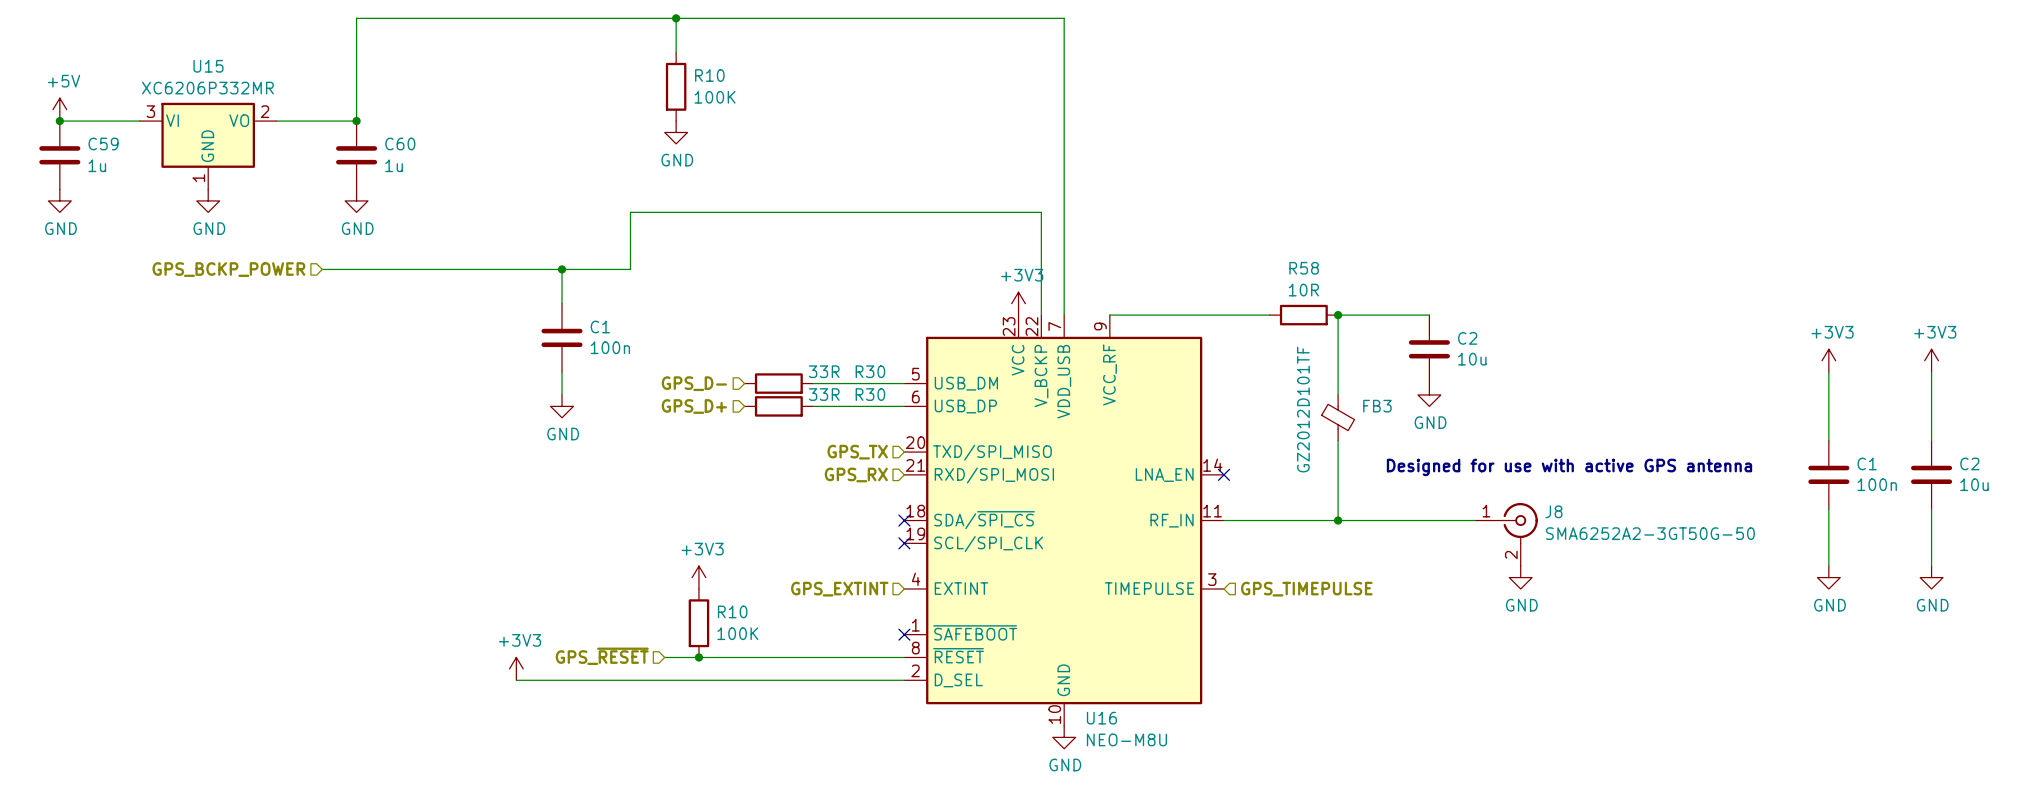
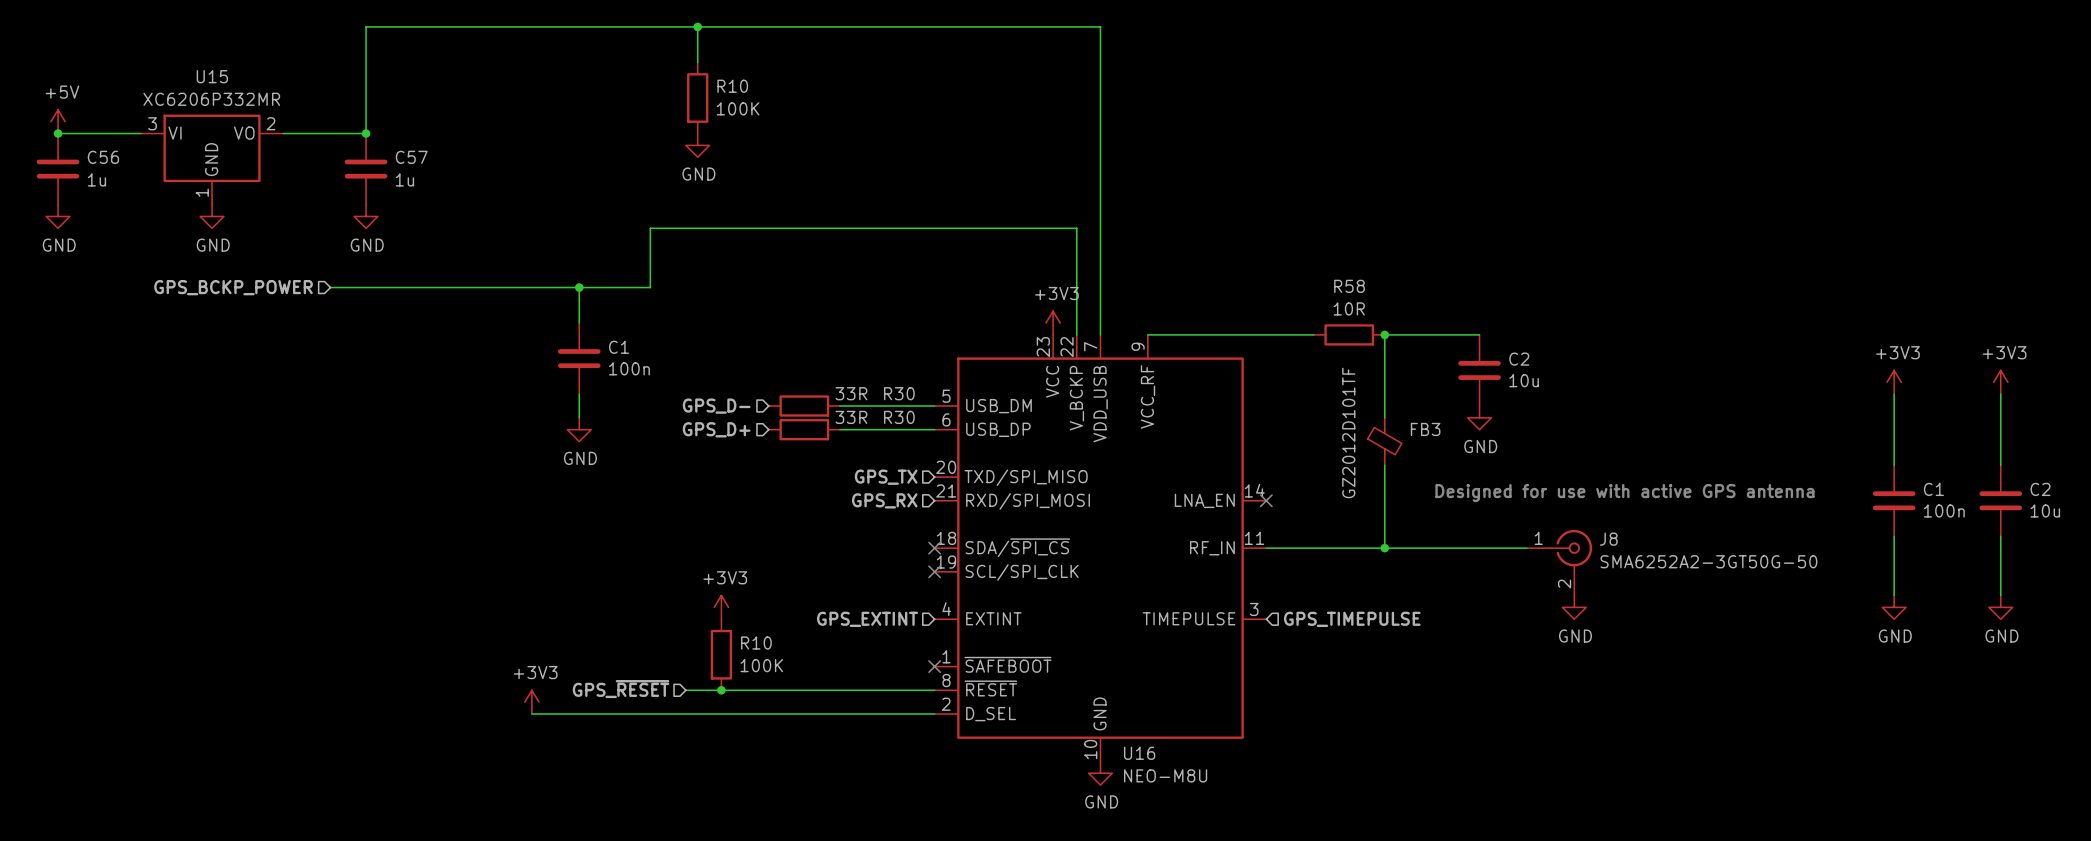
C59 name: C59 (103, 143) -> C56 (103, 157)
C60 name: C60 (400, 143) -> C57 (411, 157)

